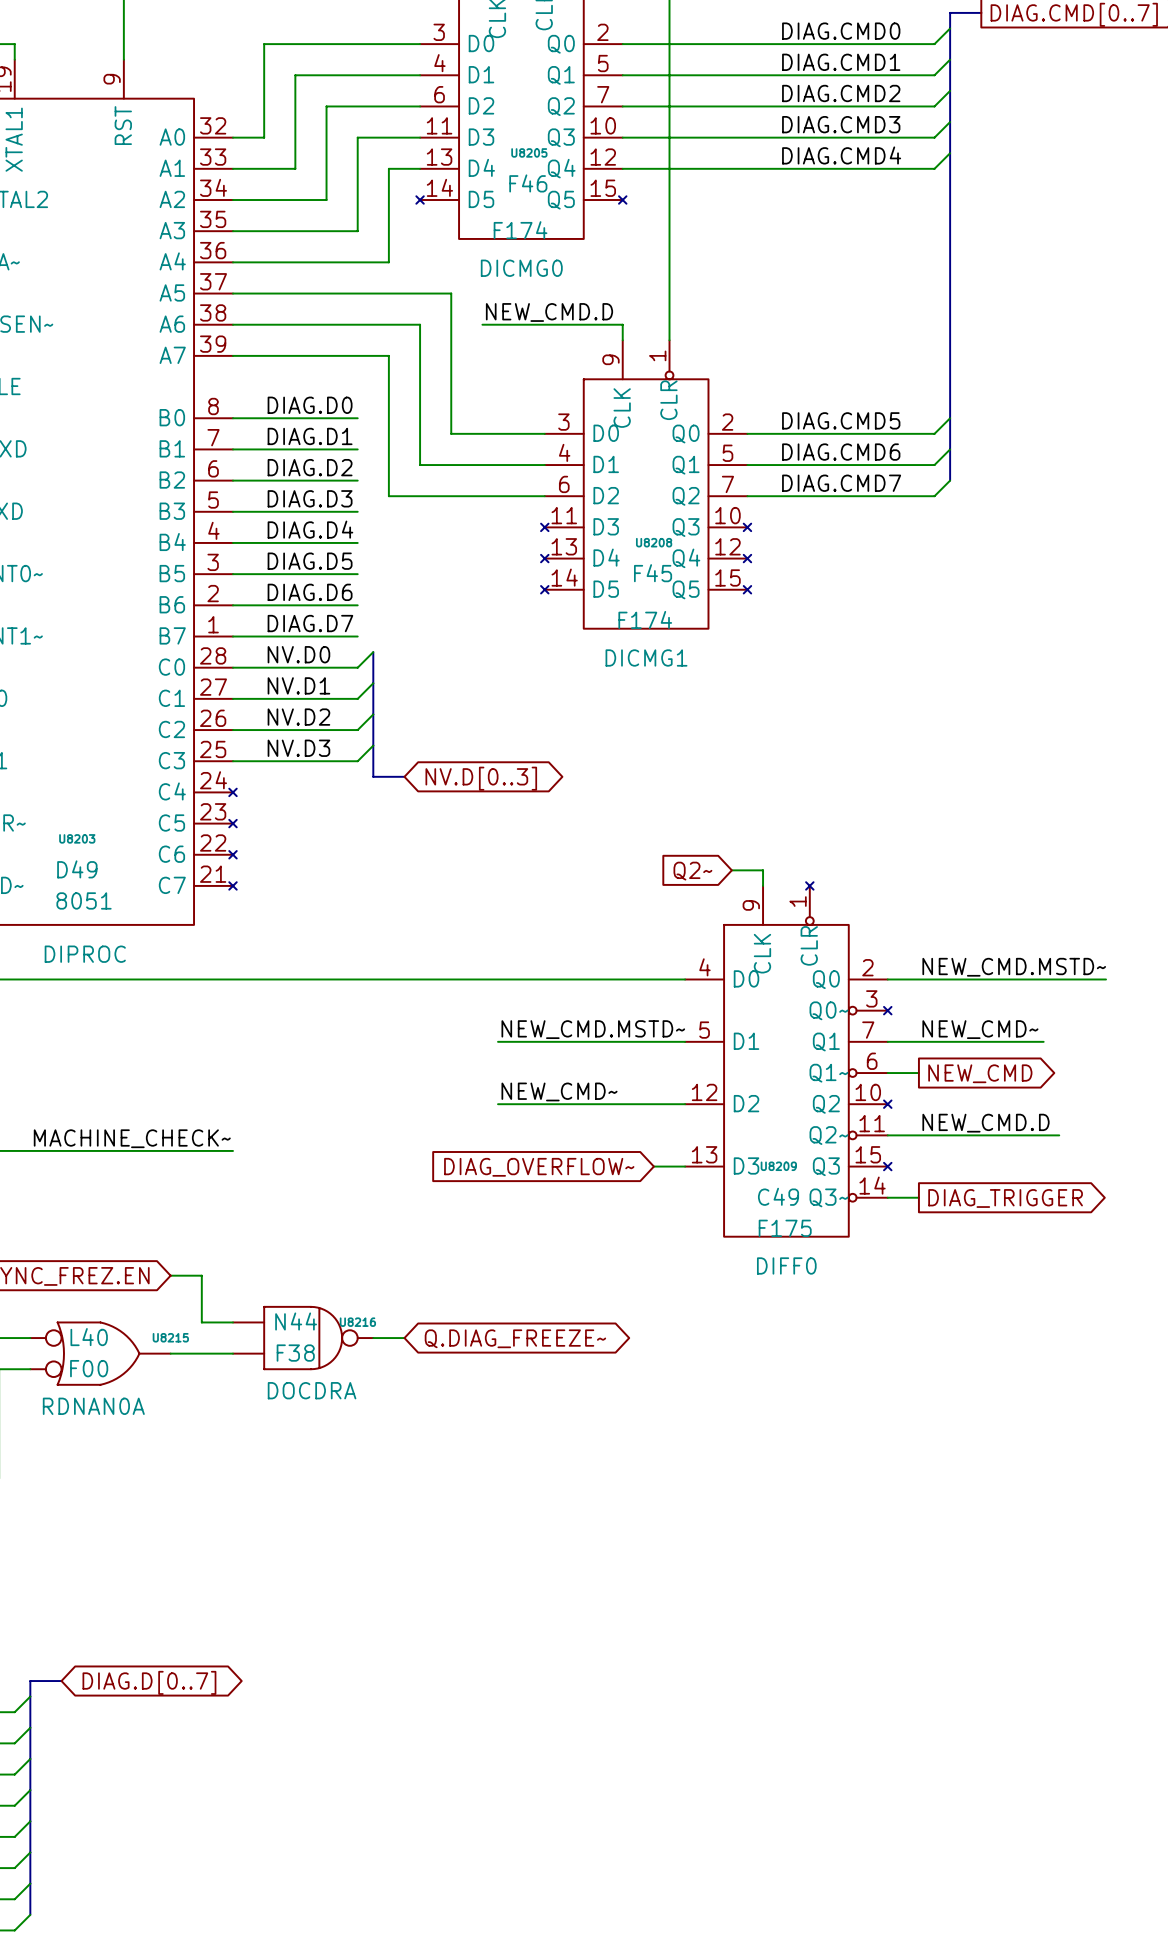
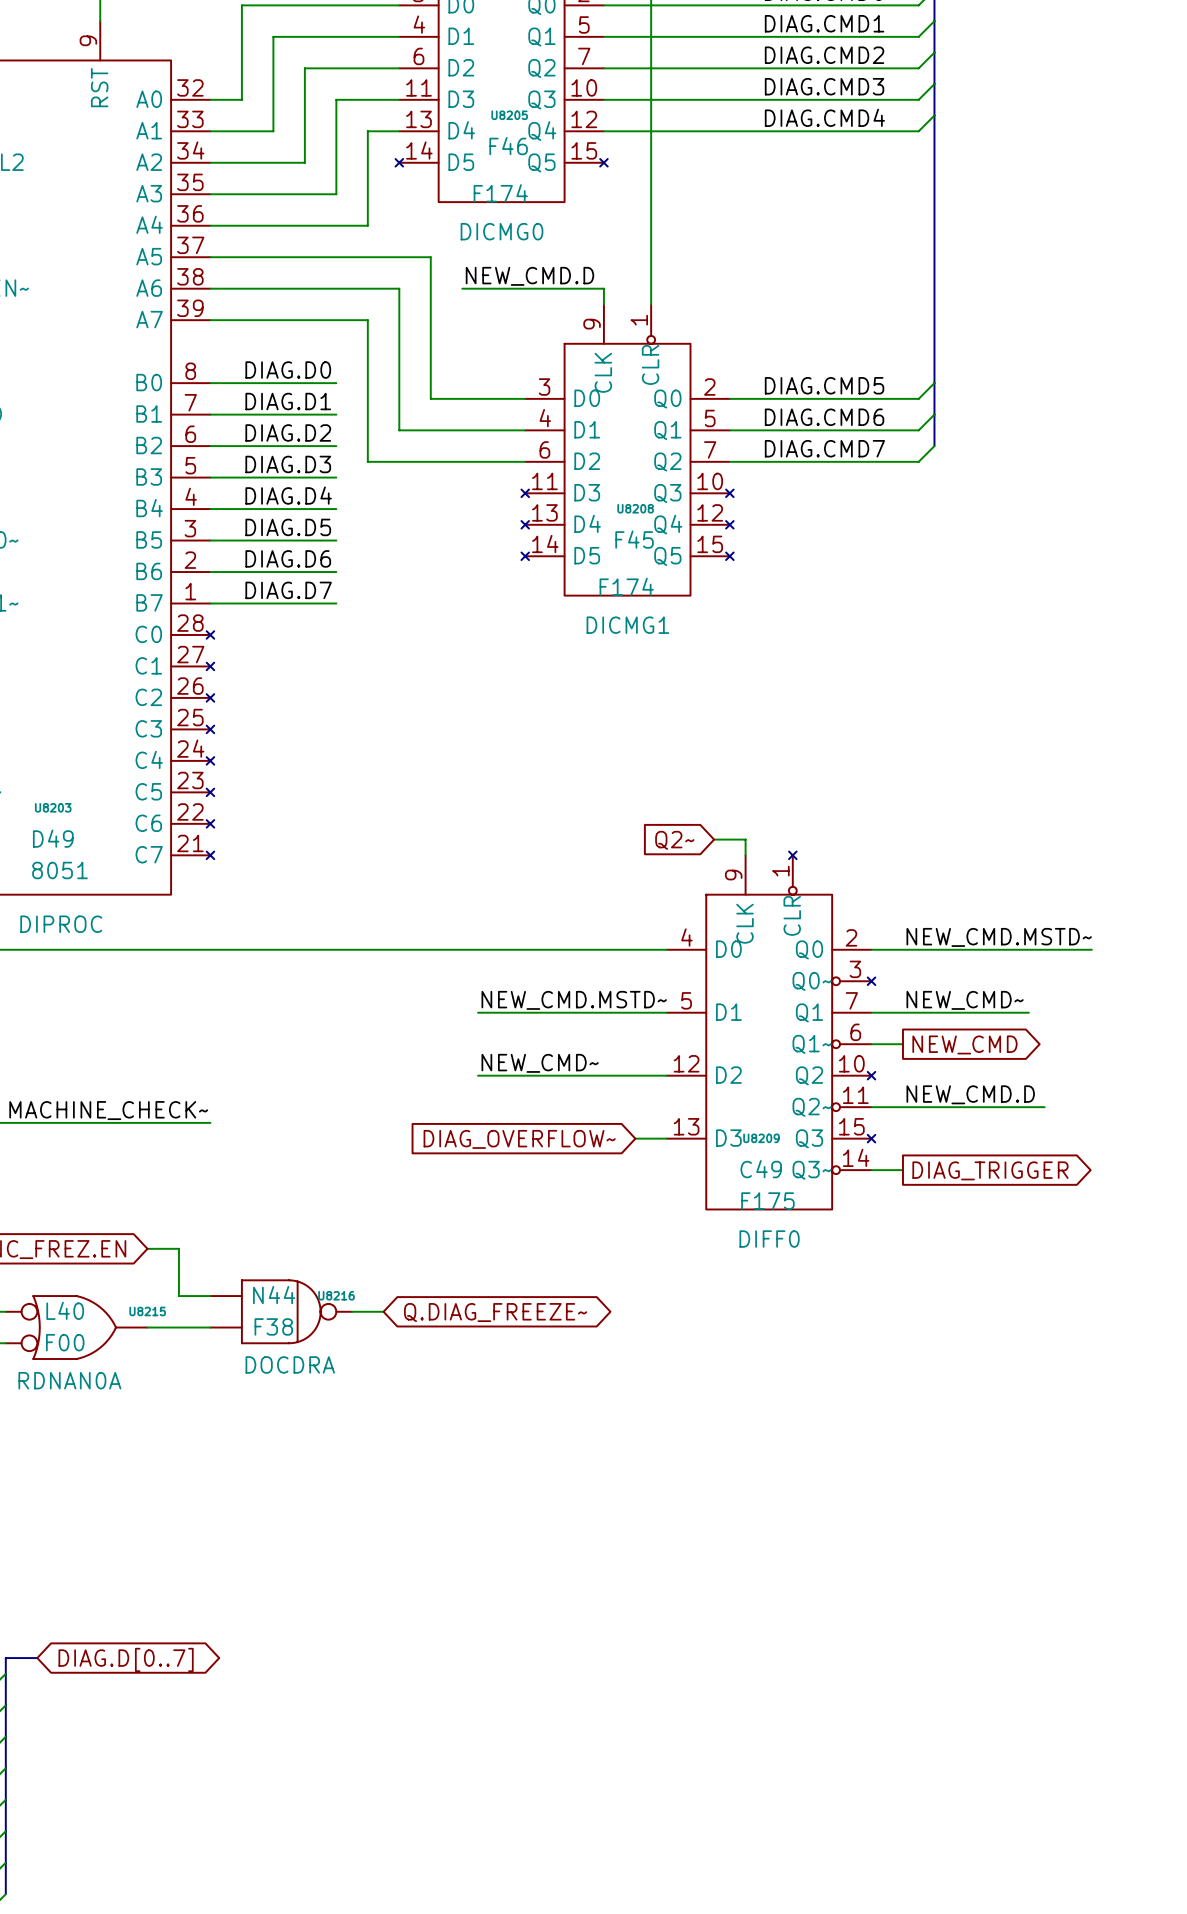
wire: (373, 652) (357, 667) (232, 667) -> none
bus: (373, 652) (373, 776) (404, 776) -> none
label: NV.D0 (298, 654) -> none
no-connect mark: none -> (210, 634)
wire: (373, 683) (357, 698) (232, 698) -> none
label: NV.D1 (298, 685) -> none
no-connect mark: none -> (210, 666)
wire: (373, 714) (357, 730) (232, 730) -> none
label: NV.D2 (298, 717) -> none
no-connect mark: none -> (210, 697)
wire: (373, 745) (357, 761) (232, 761) -> none
label: NV.D3 (298, 748) -> none
no-connect mark: none -> (210, 729)
global label: NV.D[0..3] (481, 778) -> none

